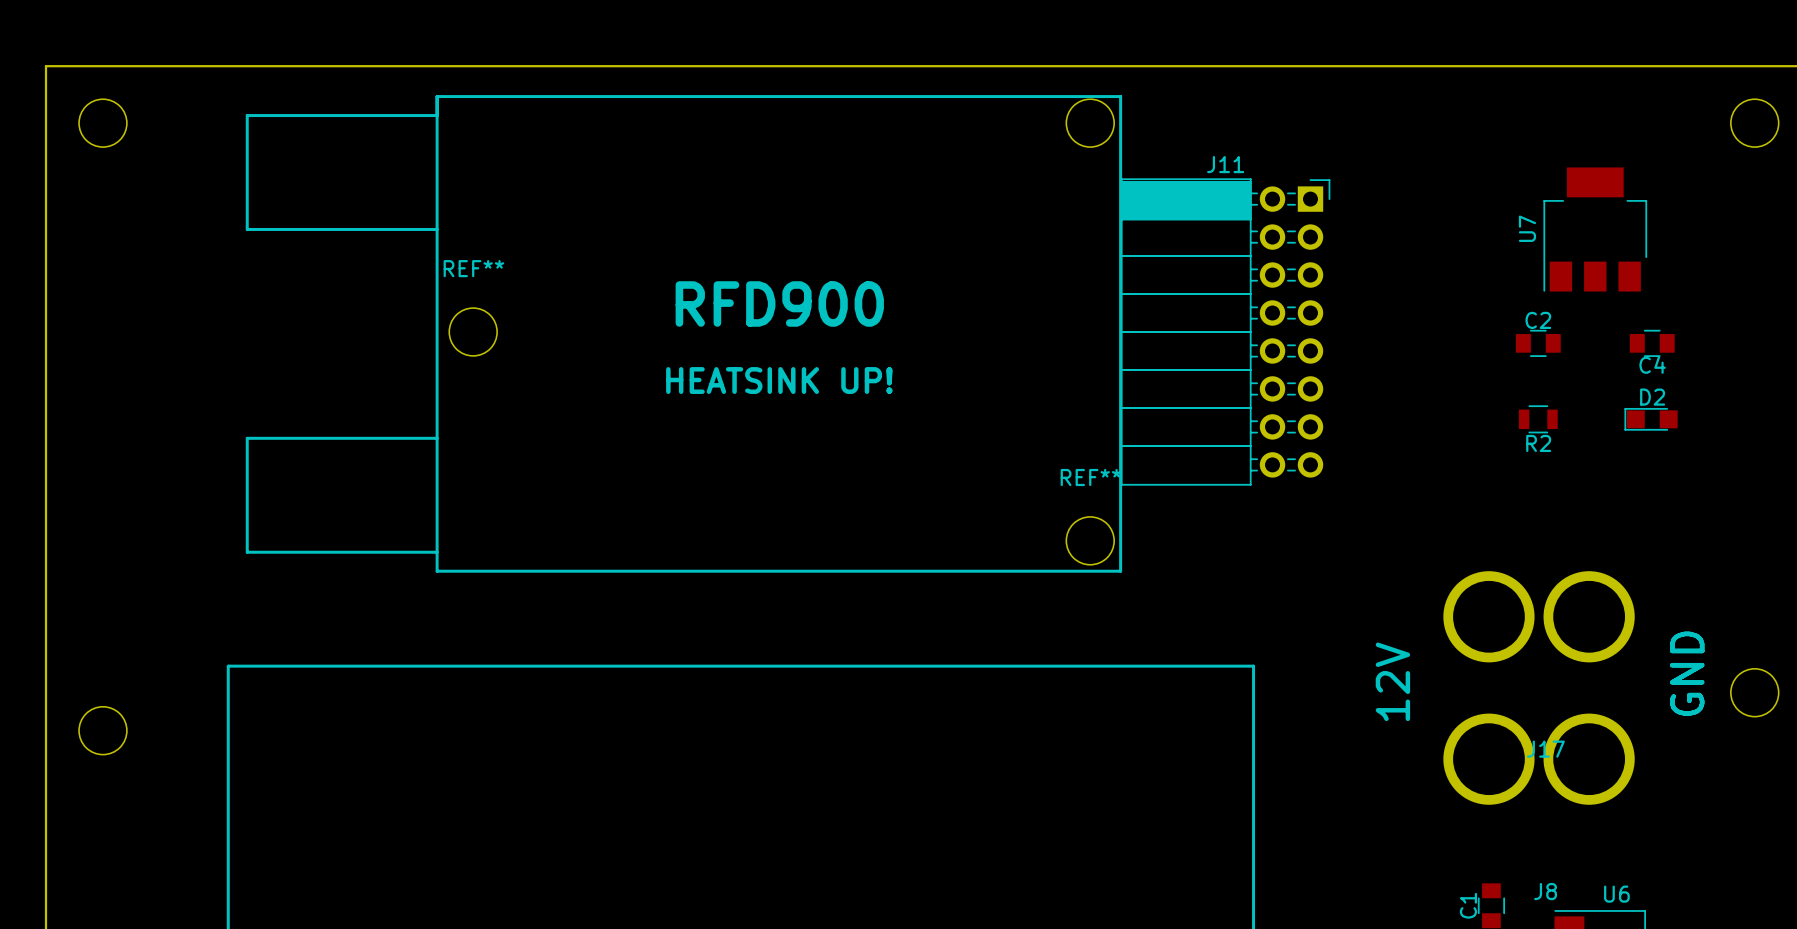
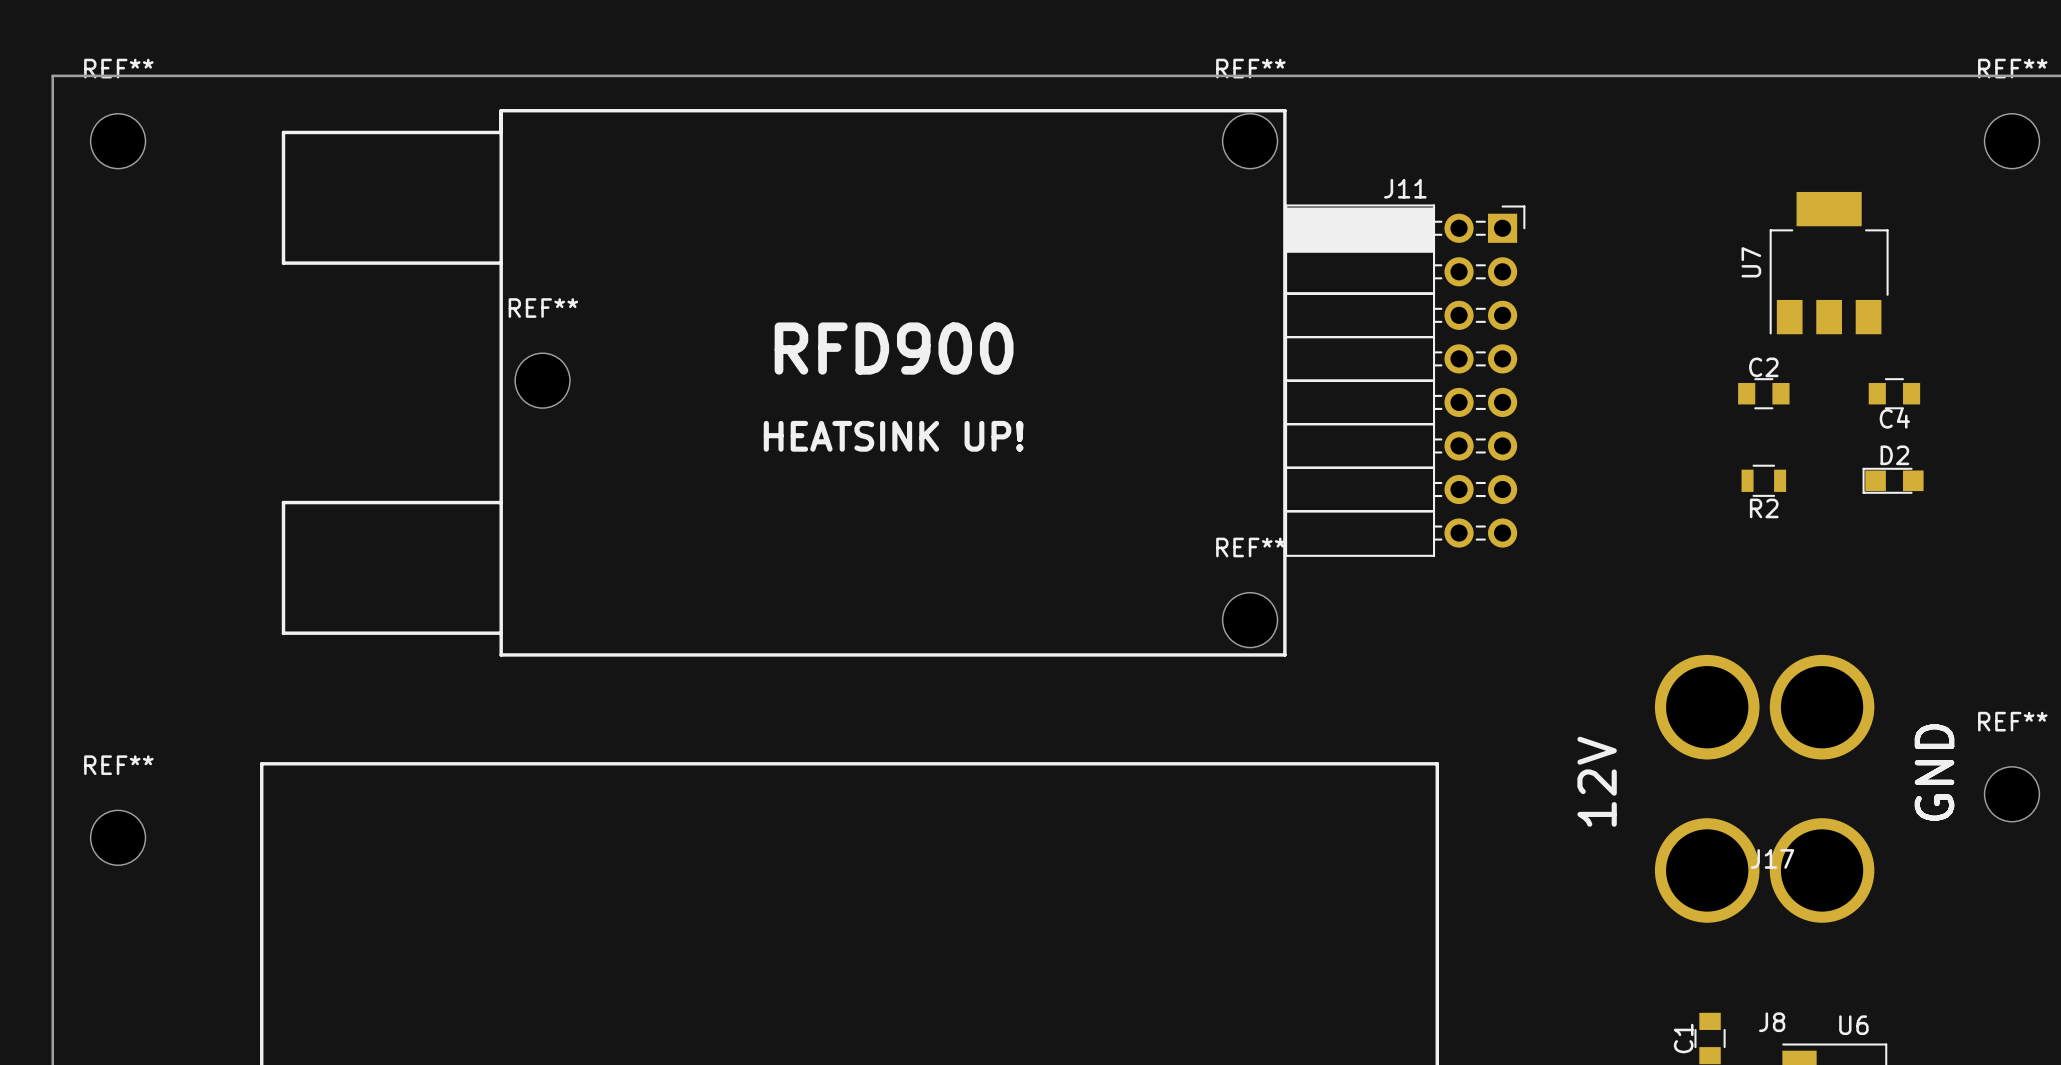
REF** name: none -> REF** (118, 68)
REF** name: none -> REF** (1250, 68)
REF** name: none -> REF** (2012, 68)
REF** name: none -> REF** (2012, 721)
REF** name: none -> REF** (118, 765)

